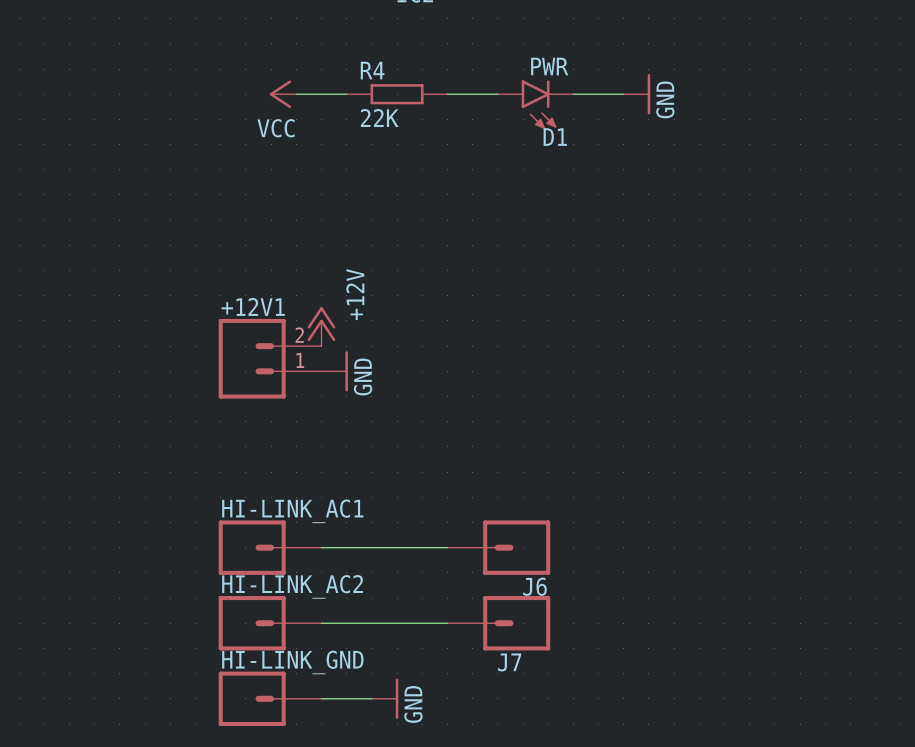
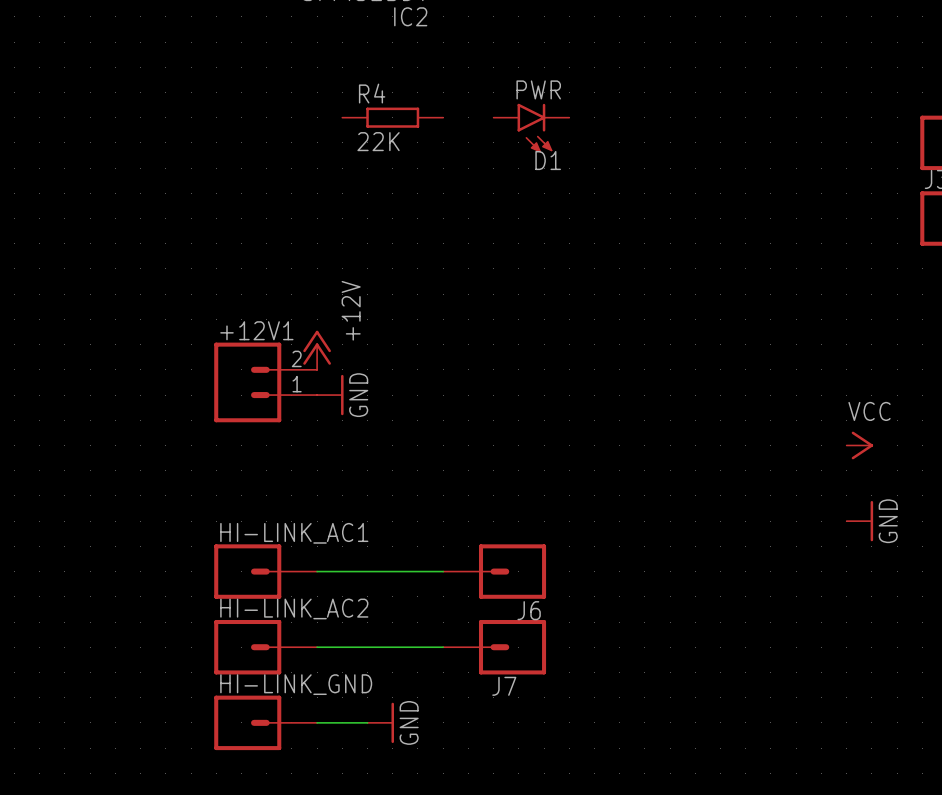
power symbol: VCC (283, 94) -> none
wire: (296, 94) (346, 94) -> none
wire: (447, 94) (497, 94) -> none
wire: (573, 94) (623, 94) -> none
power symbol: GND (636, 94) -> none
power symbol: none -> VCC (859, 445)
power symbol: none -> GND (859, 521)

